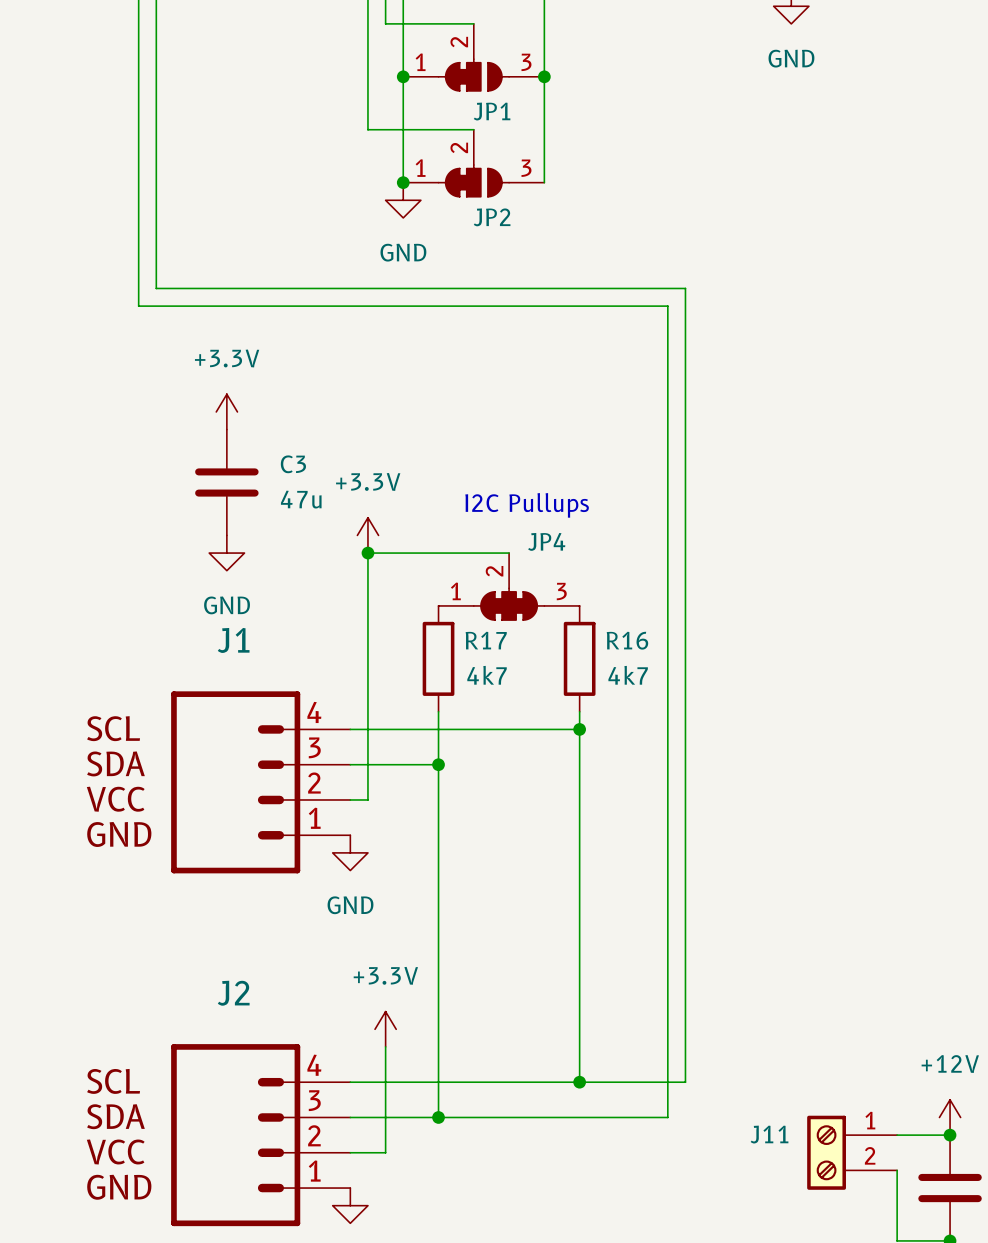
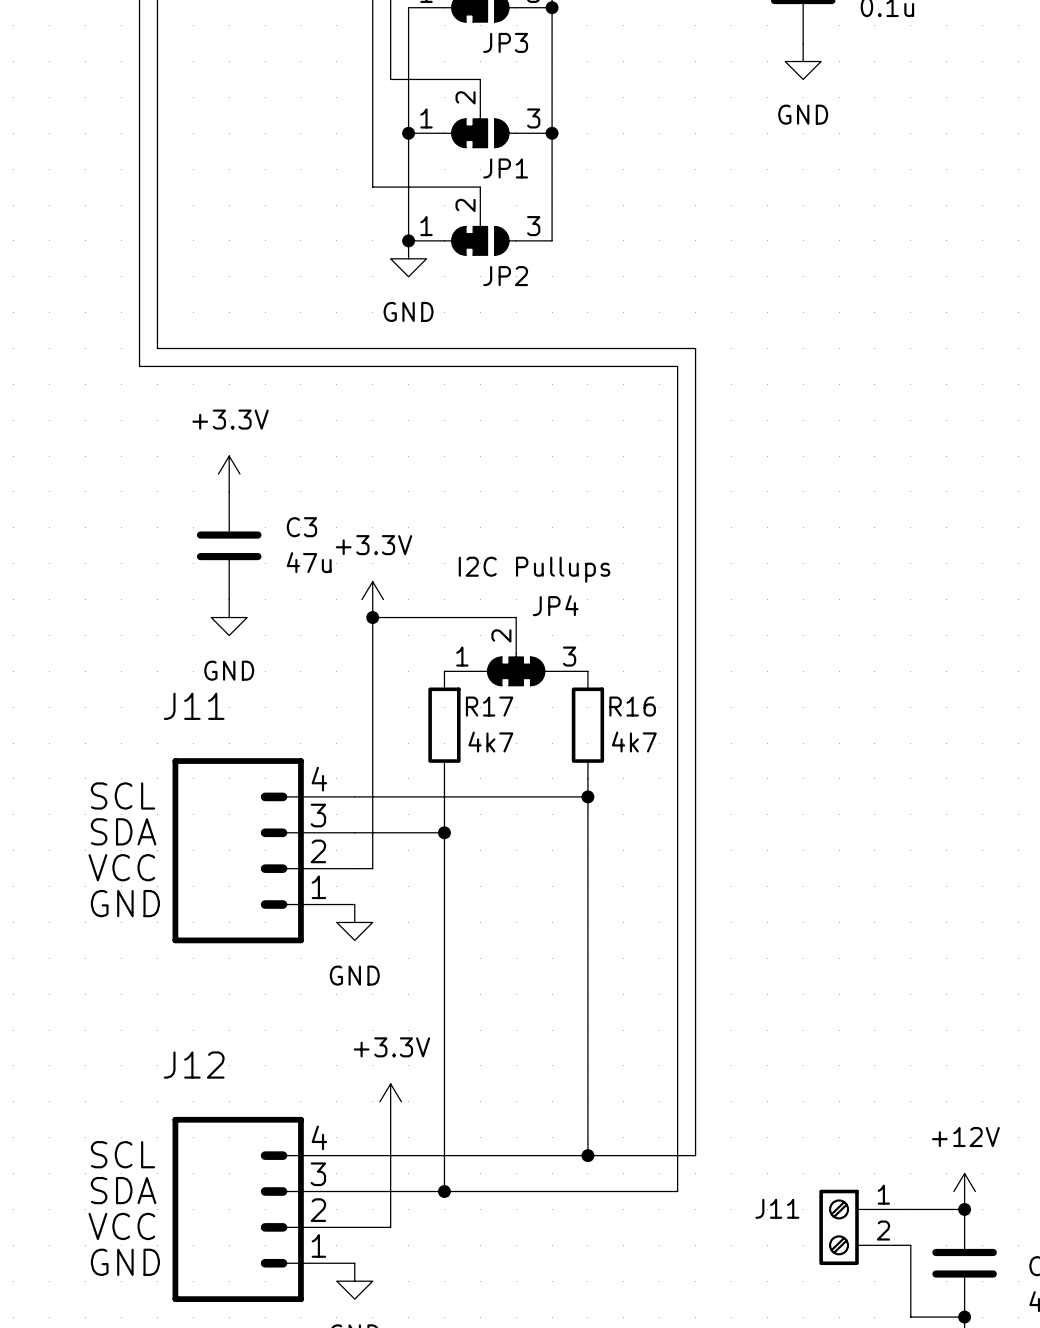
J1 name: J1 (233, 640) -> J11 (194, 706)
J2 name: J2 (233, 993) -> J12 (194, 1065)

